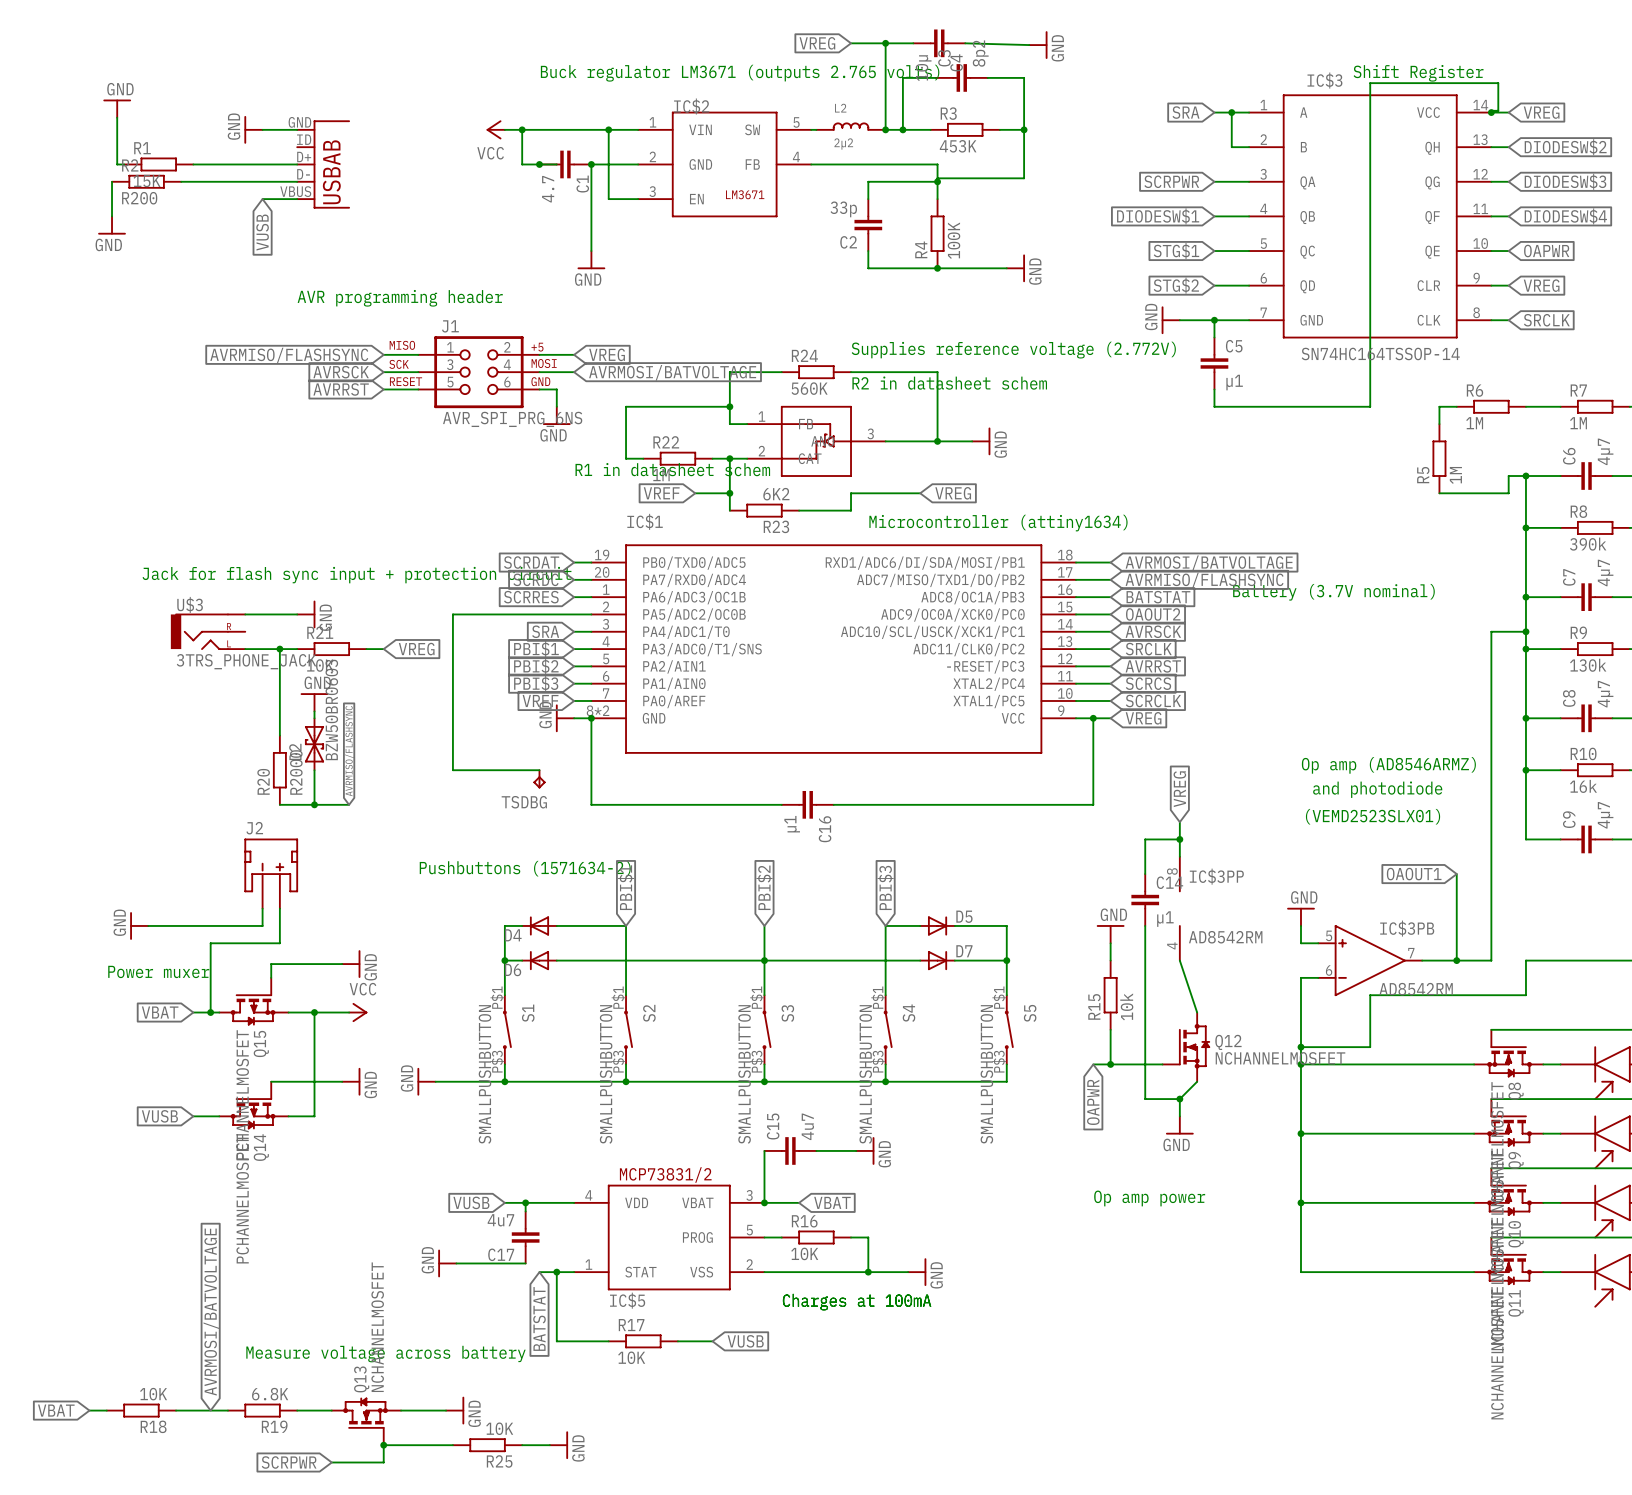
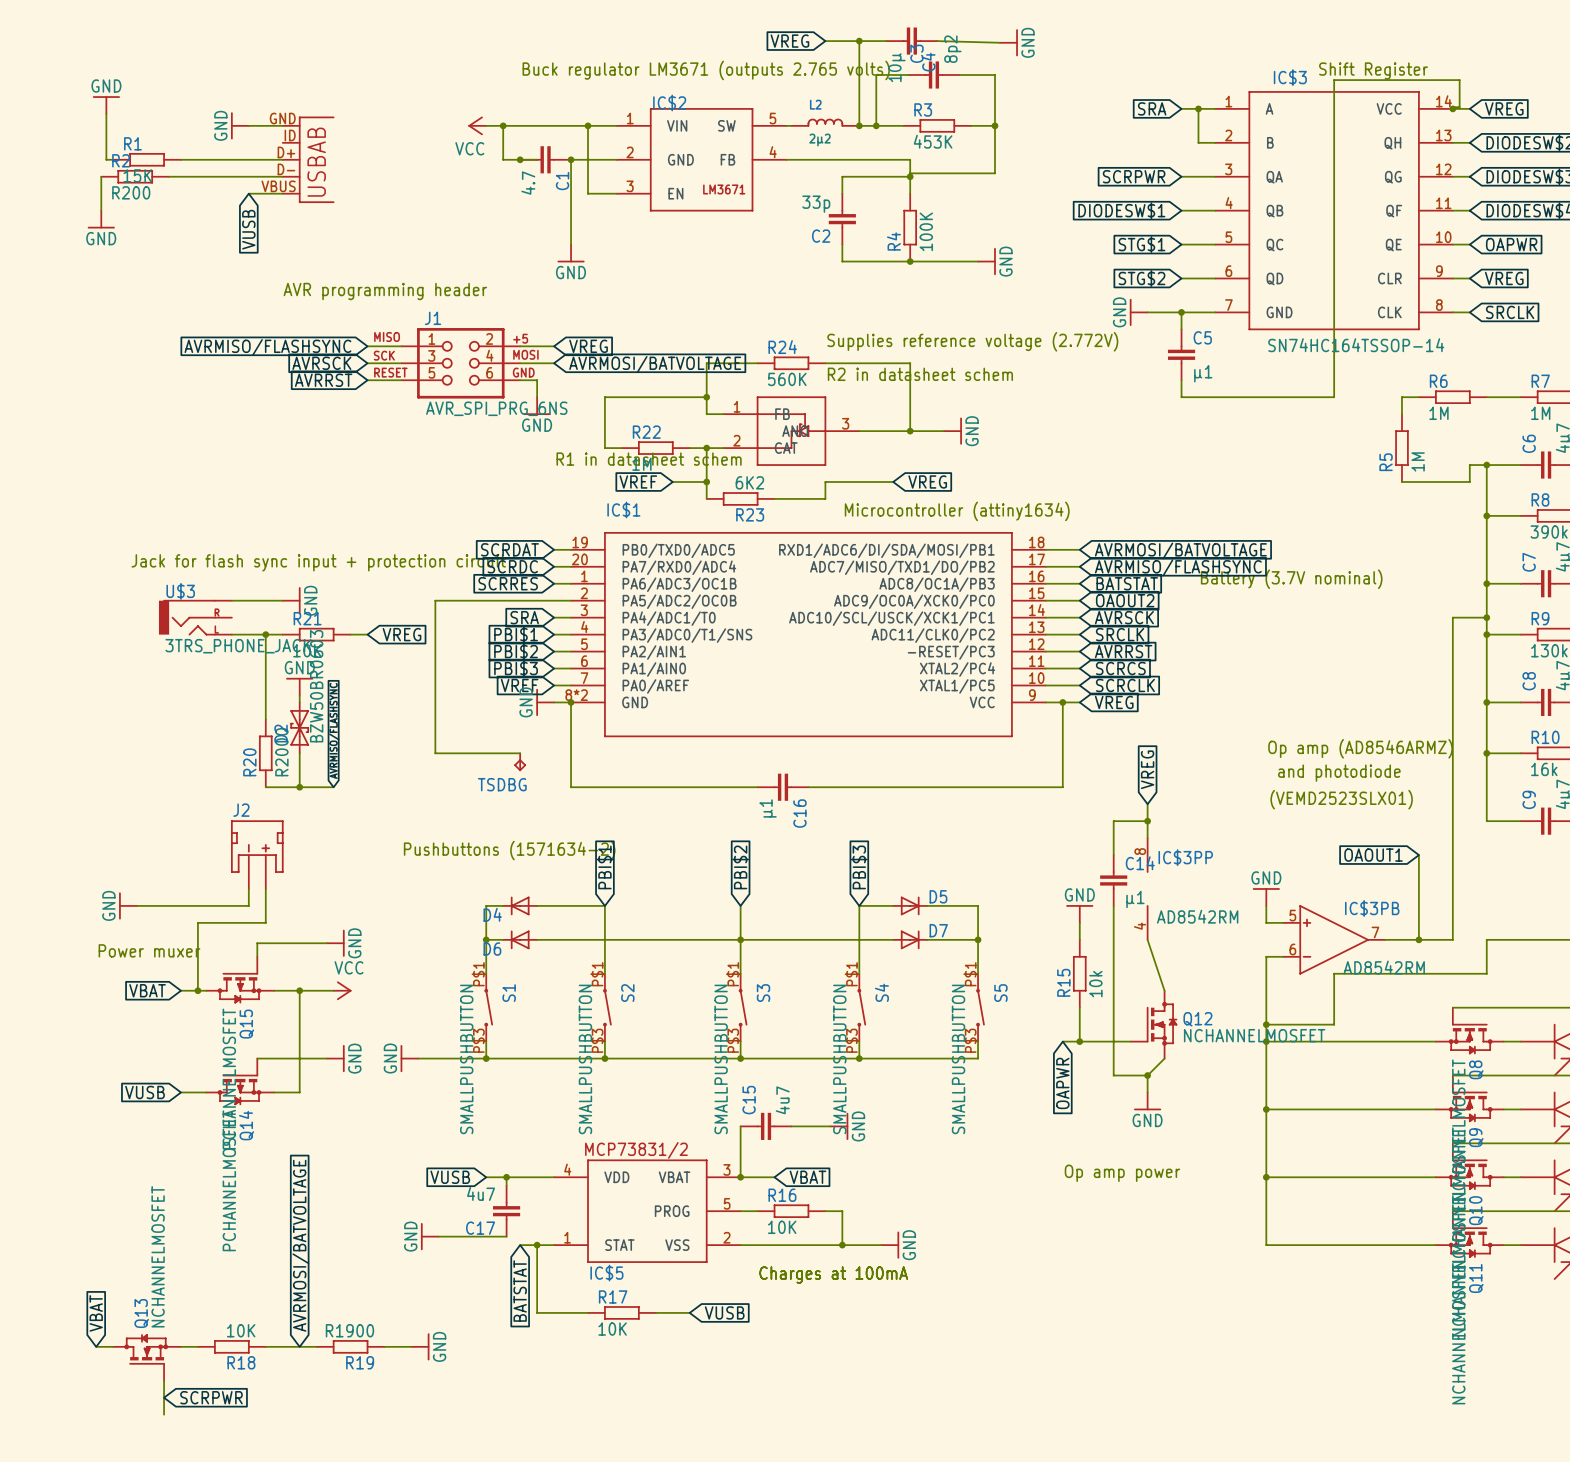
global label position: AVRMOSI/BATVOLTAGE (211, 1312) -> AVRMOSI/BATVOLTAGE (300, 1245)
text: Measure voltage across battery (385, 1354) -> none
wire: none -> (96, 1346) (113, 1346)
wire: none -> (265, 1346) (316, 1346)
R19 value: 6.8K (270, 1394) -> R1900 (349, 1330)
global label rotation: 0° (56, 1410) -> 90° clockwise (96, 1313)
global label position: VBAT (56, 1410) -> VBAT (96, 1313)
wire: (89, 1410) (106, 1410) -> (180, 1346) (197, 1346)
R18 position: (141, 1410) -> (231, 1346)
wire: (176, 1410) (227, 1410) -> (164, 1380) (164, 1414)
R19 position: (262, 1410) -> (350, 1346)
wire: (297, 1410) (331, 1410) -> none
wire: (401, 1410) (446, 1410) -> none
power symbol position: GND (455, 1410) -> GND (420, 1346)
Q13 position: (366, 1421) -> (147, 1357)
junction: (383, 1445) -> none
wire: (452, 1445) (383, 1445) (383, 1462) (331, 1462) -> none
R25: 10K (487, 1445) -> none
wire: (522, 1445) (549, 1445) -> (384, 1346) (411, 1346)
power symbol: GND (558, 1445) -> none
global label rotation: 0° (289, 1462) -> 180° (211, 1397)

